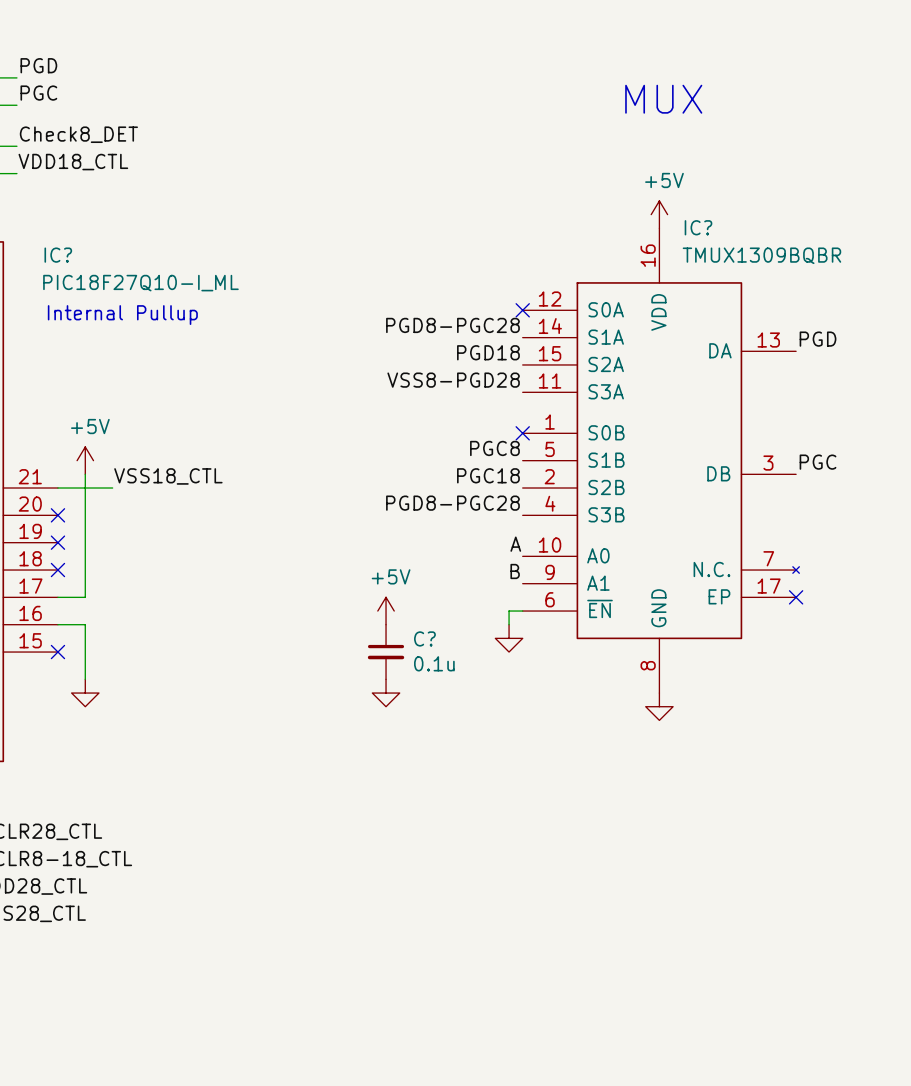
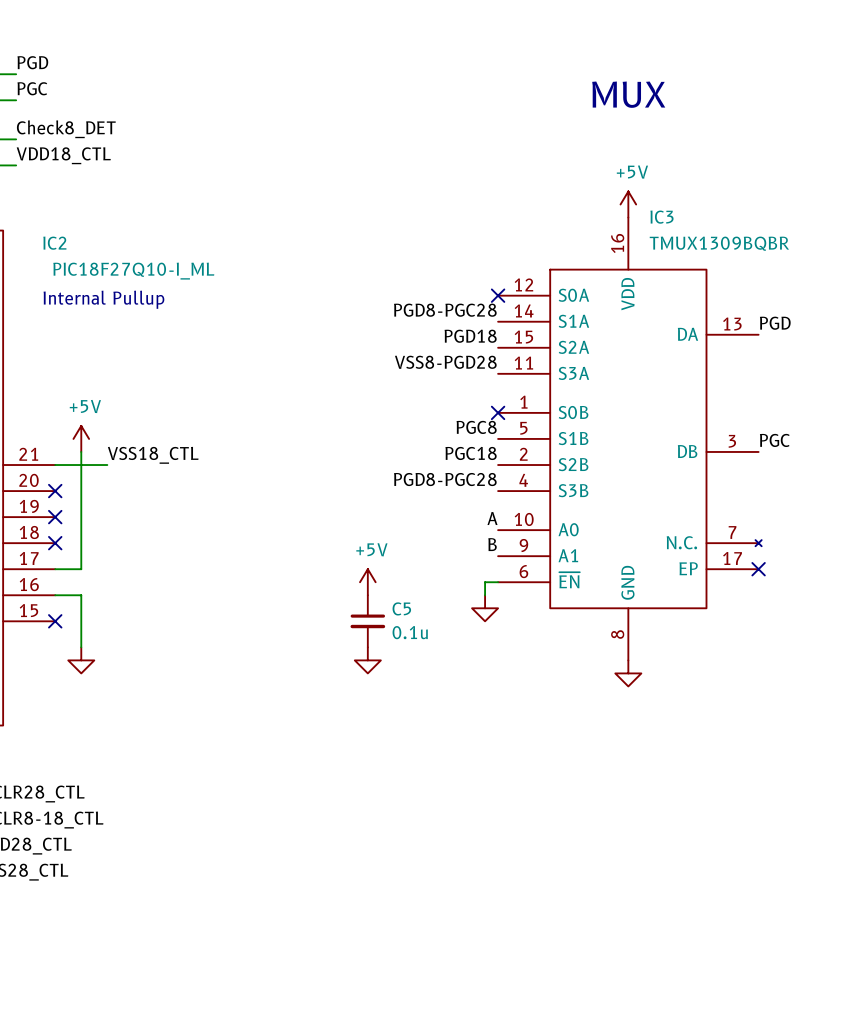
IC? name: IC? (698, 227) -> IC3 (661, 217)
IC? name: IC? (58, 255) -> IC2 (54, 243)
C? name: C? (424, 638) -> C5 (401, 608)

